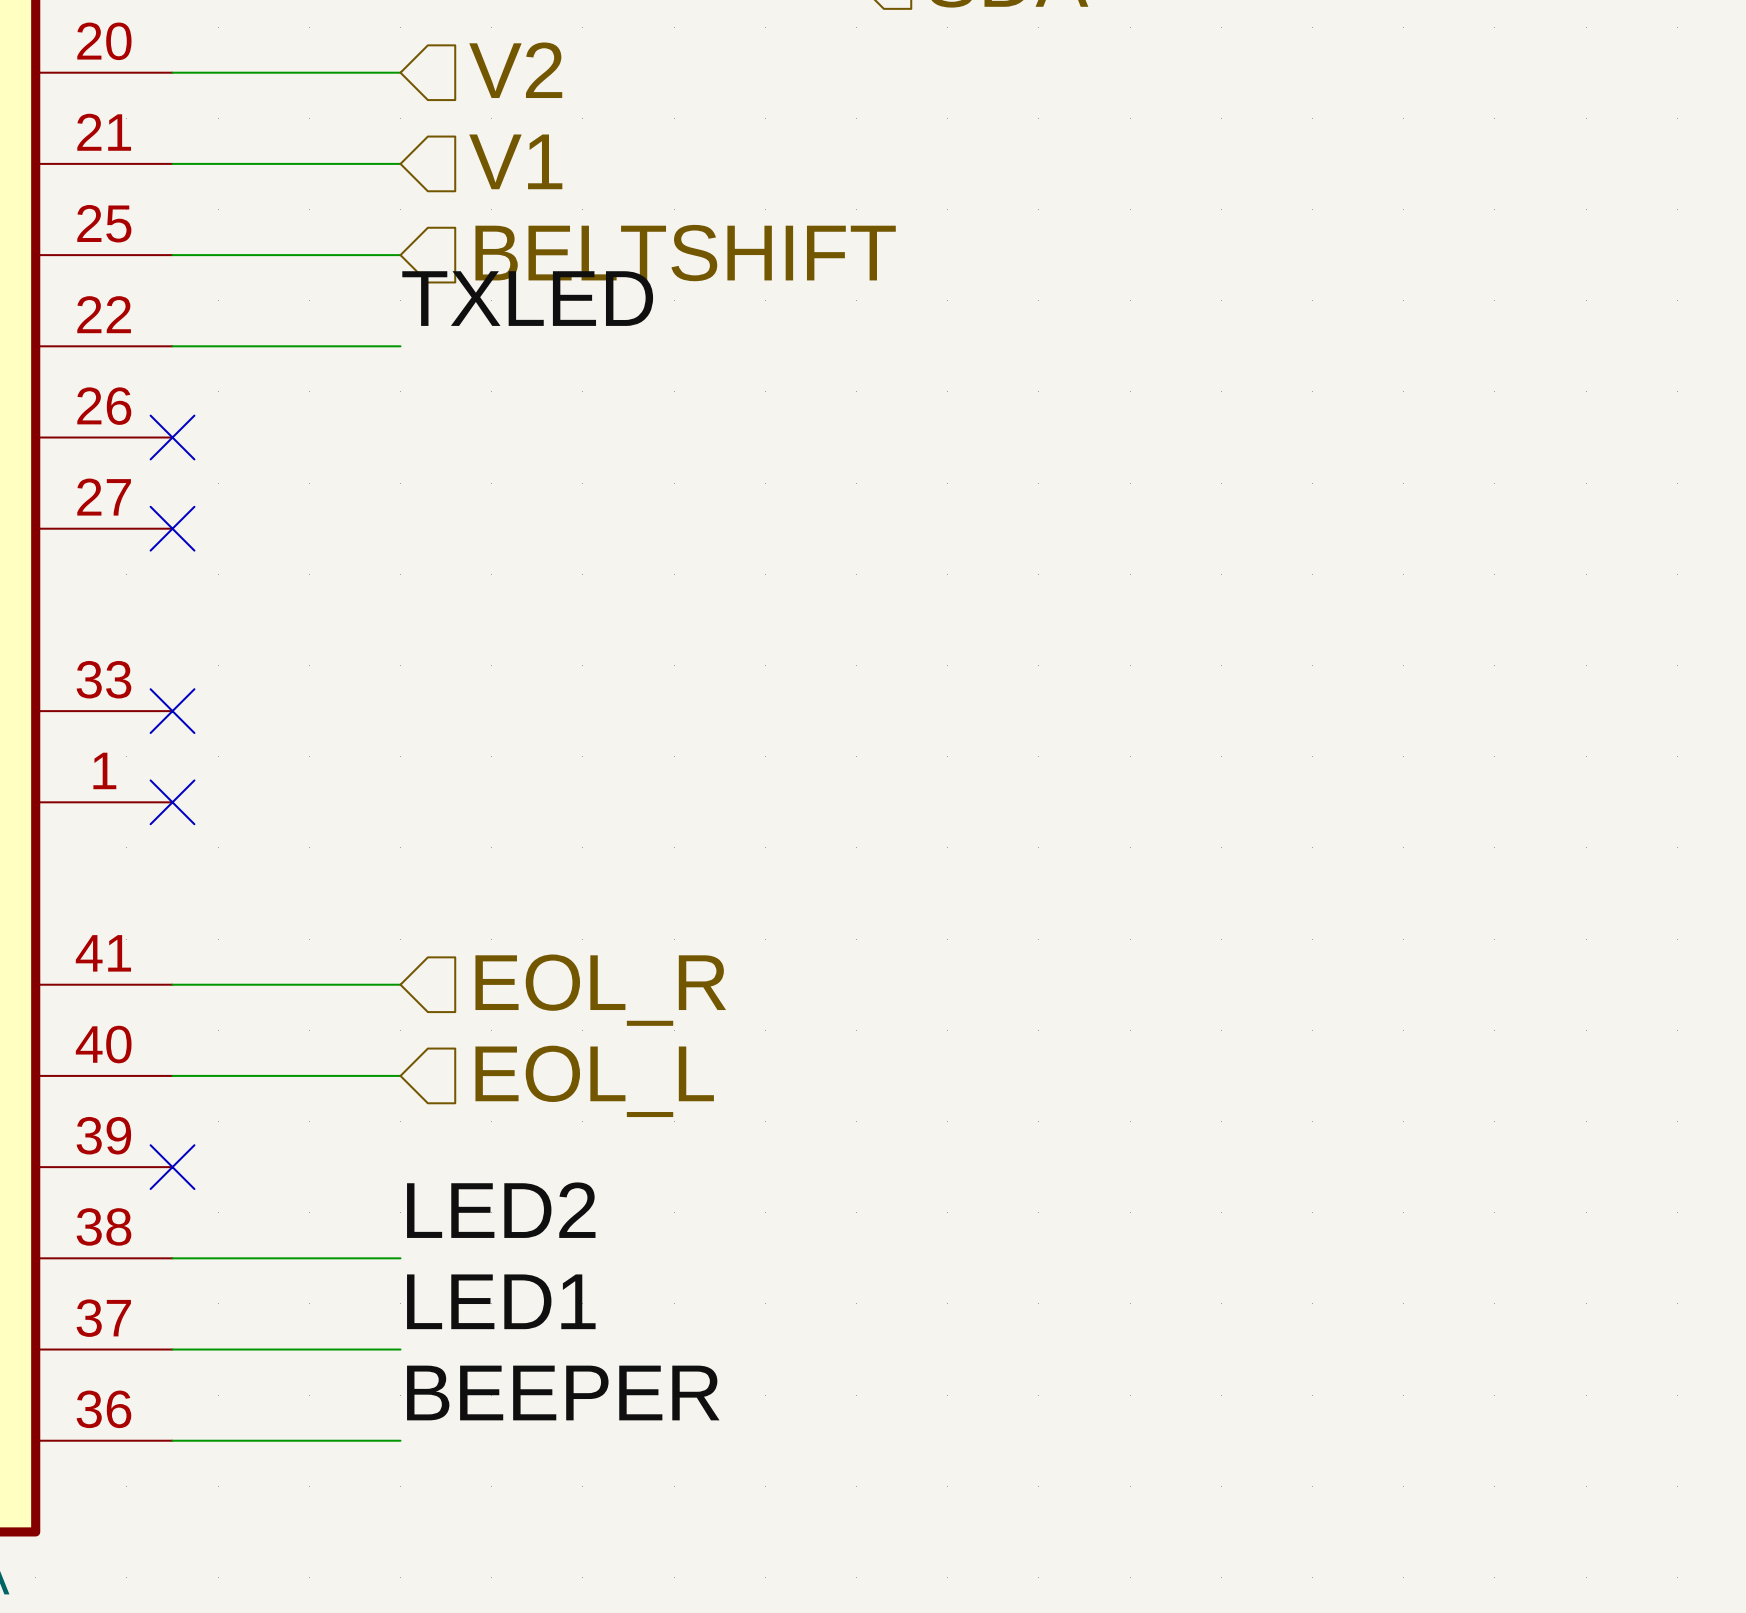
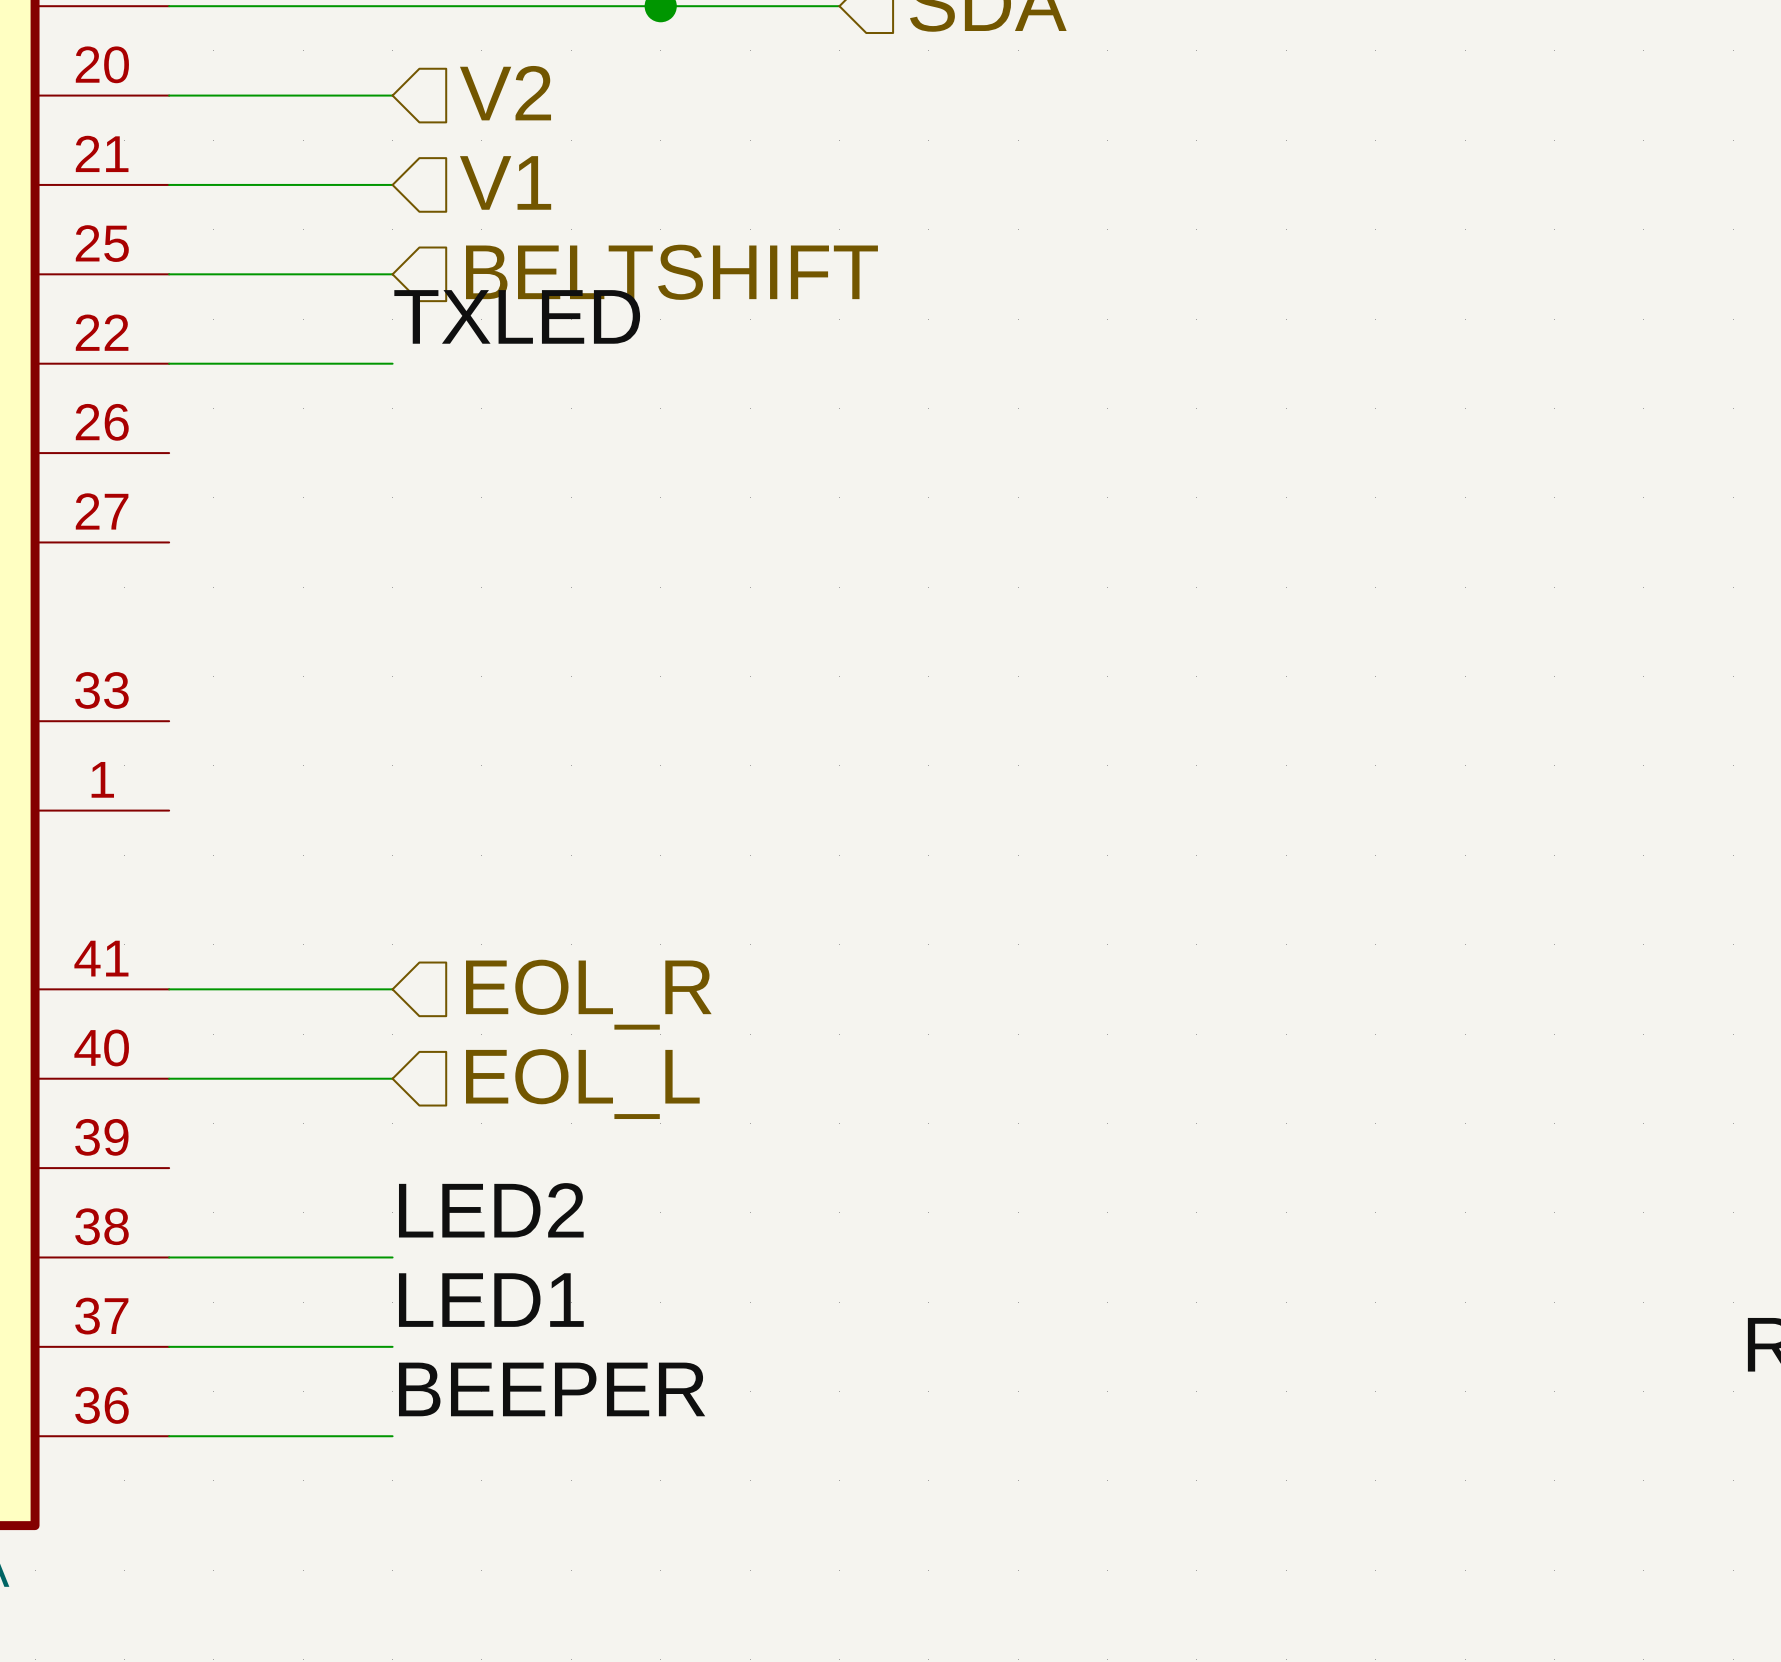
no-connect mark: (172, 437) -> none
no-connect mark: (172, 528) -> none
no-connect mark: (172, 711) -> none
no-connect mark: (172, 802) -> none
no-connect mark: (172, 1167) -> none

